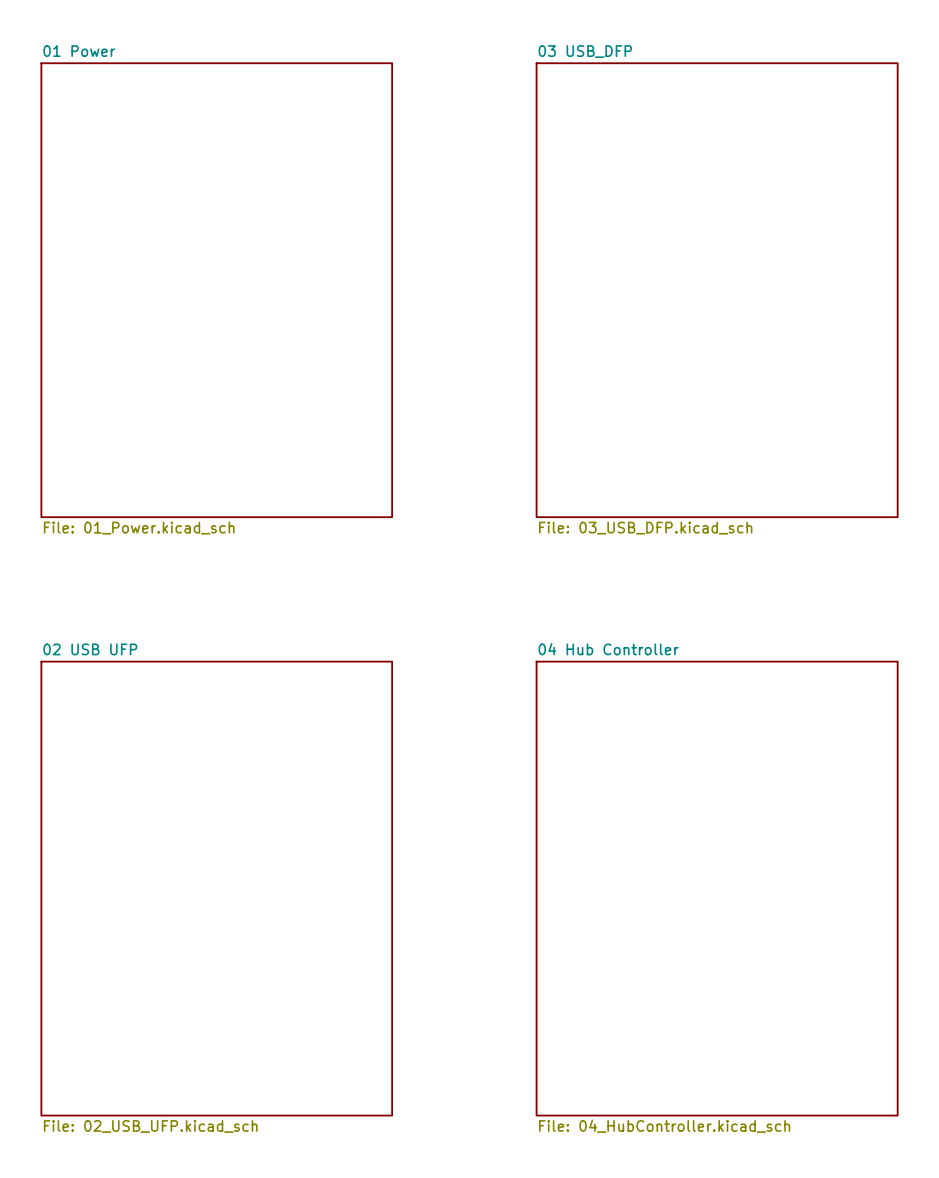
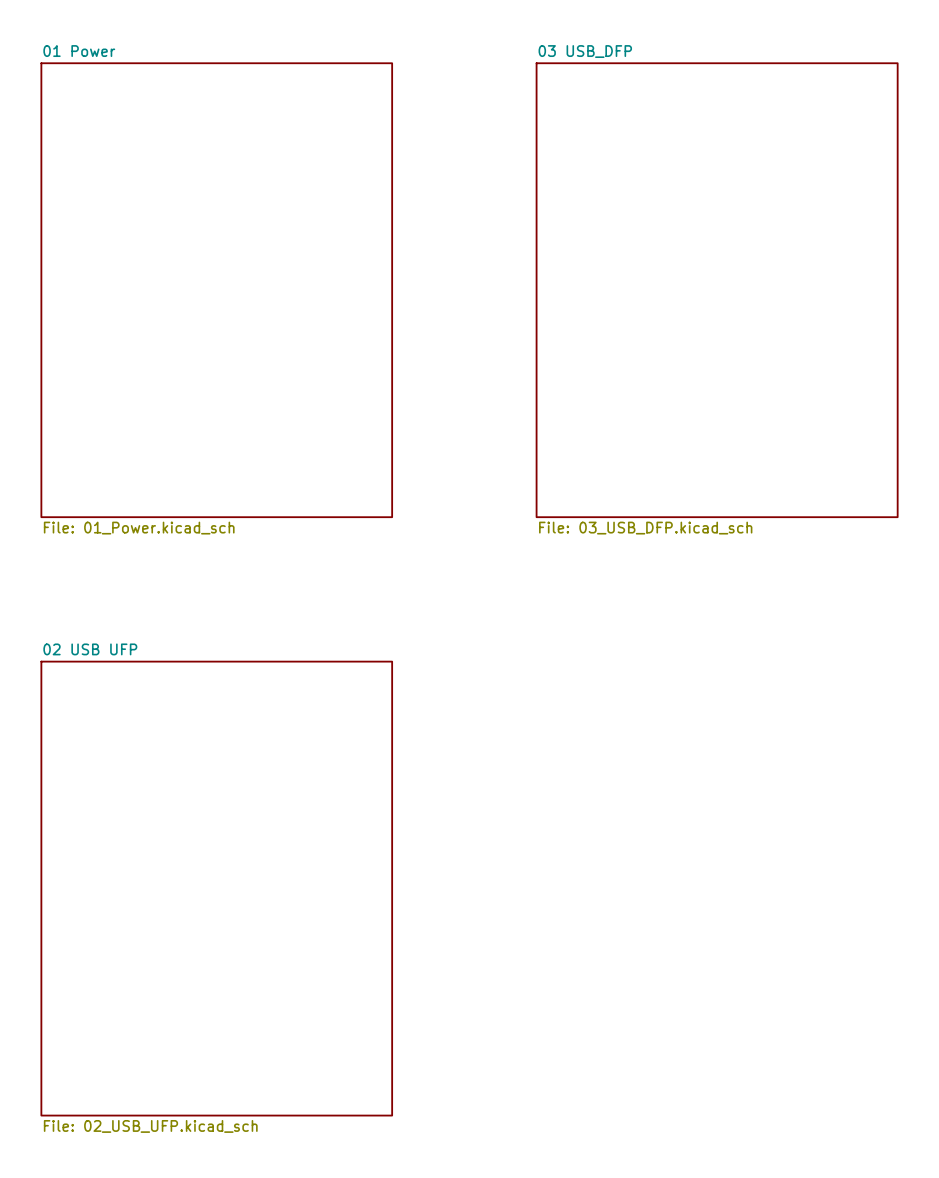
sheet 04 Hub Controller: File: 04_HubController.kicad_sch (717, 888) -> none

